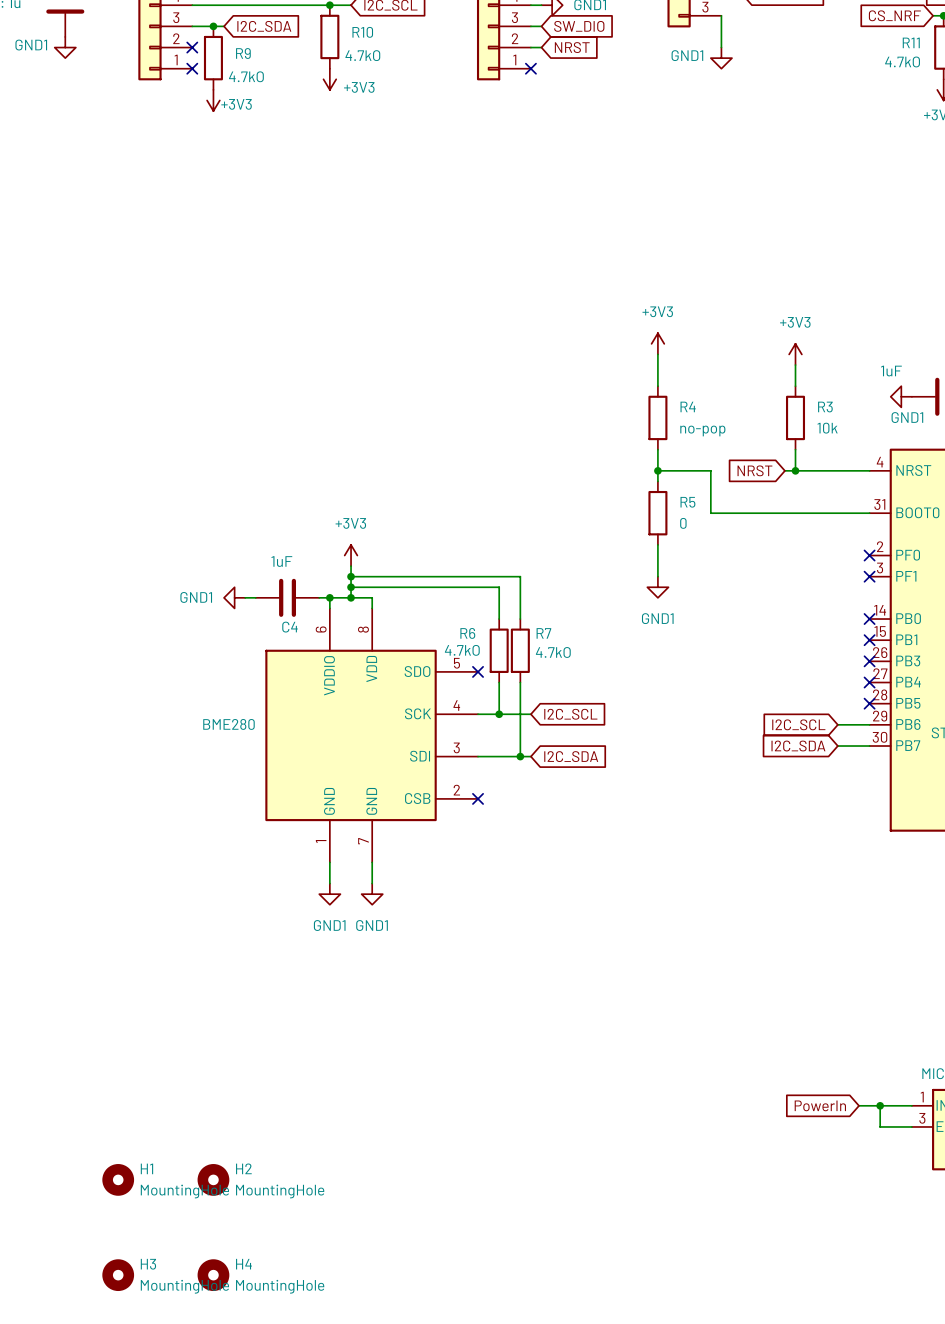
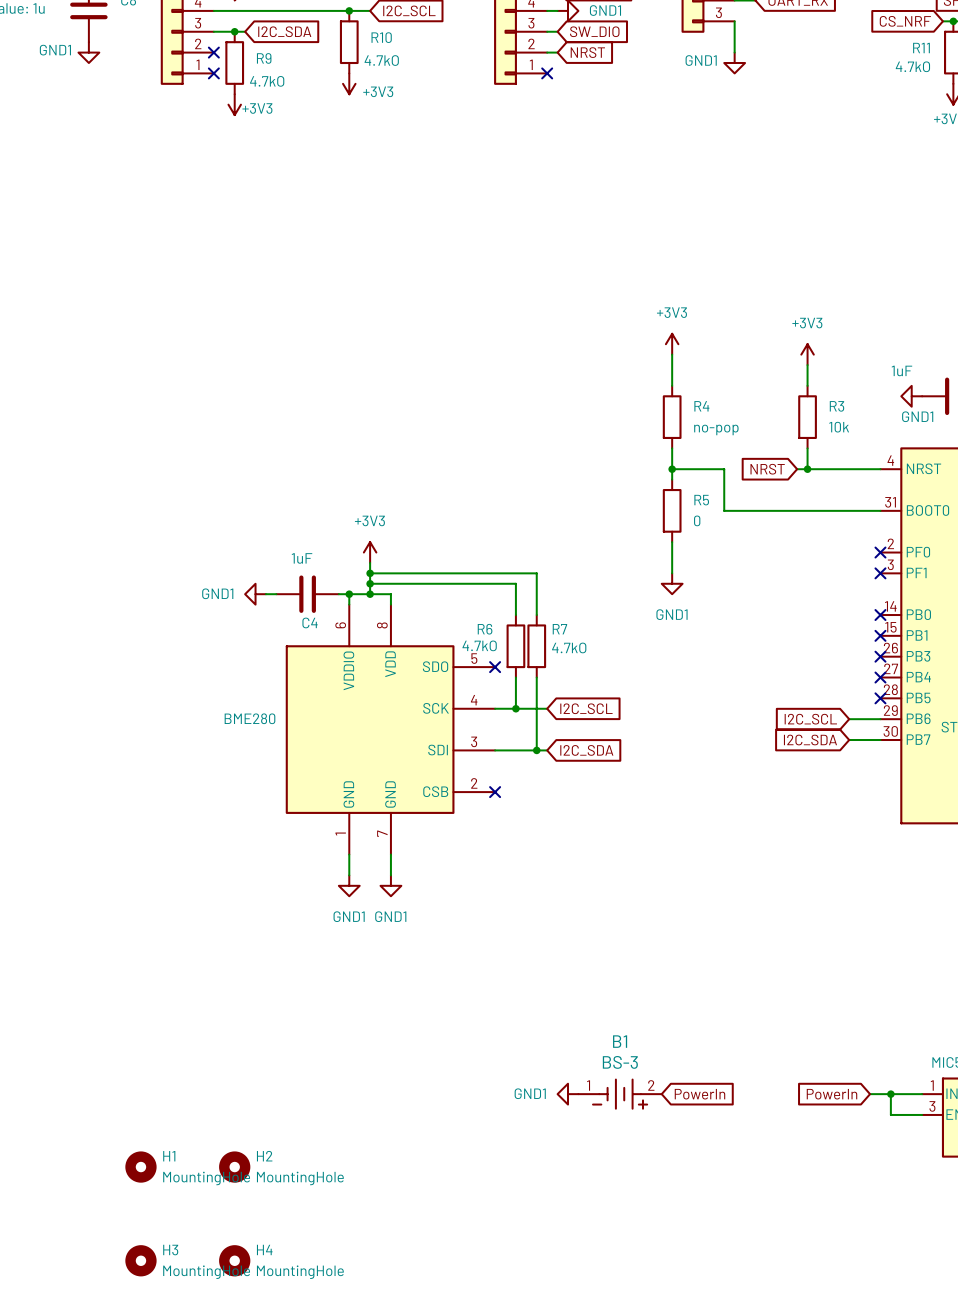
power symbol: none -> GND1 (568, 1094)
B1: none -> BS-3 (620, 1094)
global label: none -> PowerIn (699, 1094)

